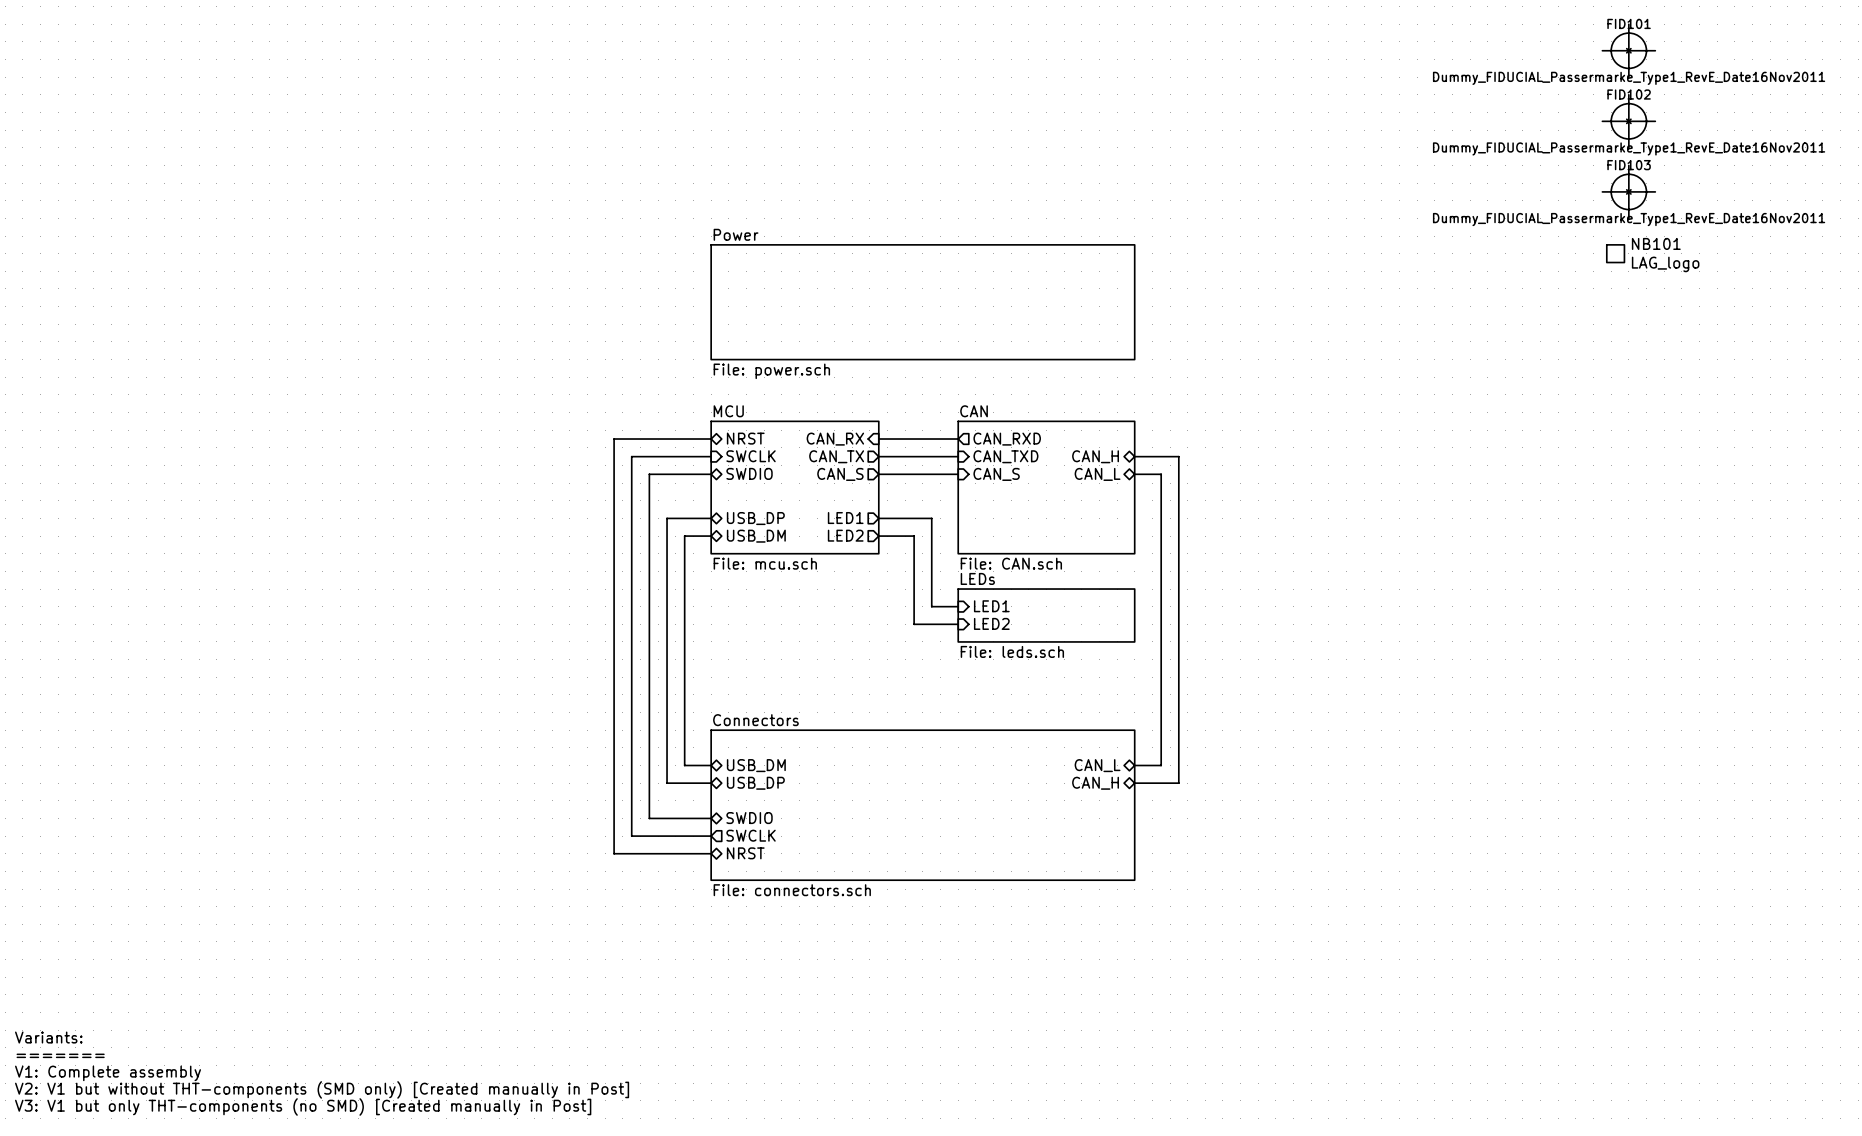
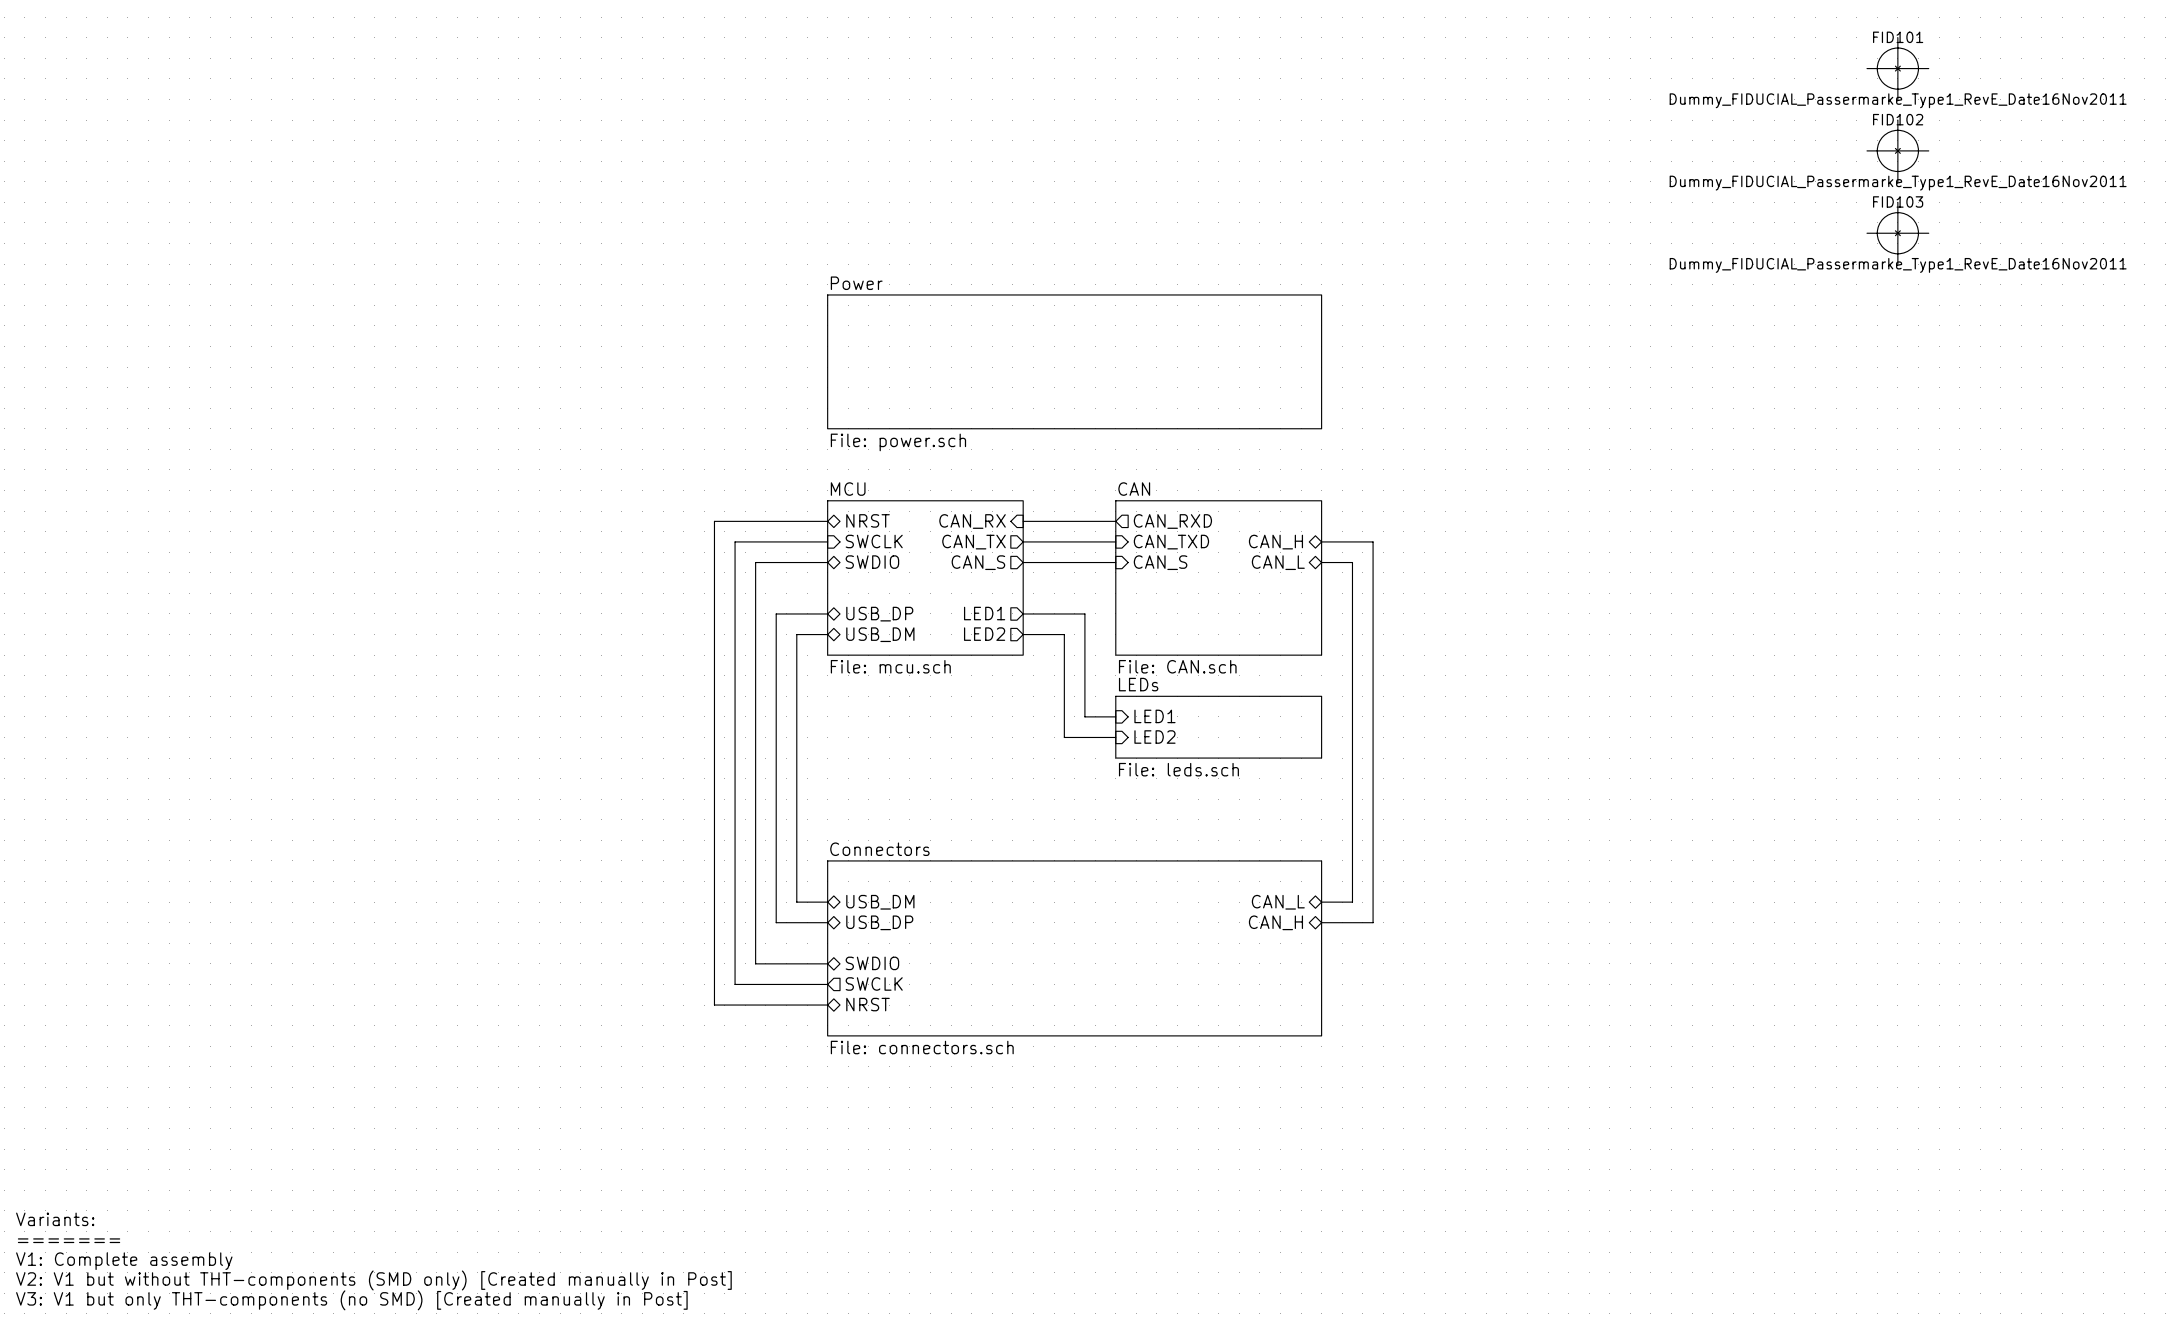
NB101: LAG_logo (1615, 253) -> none

